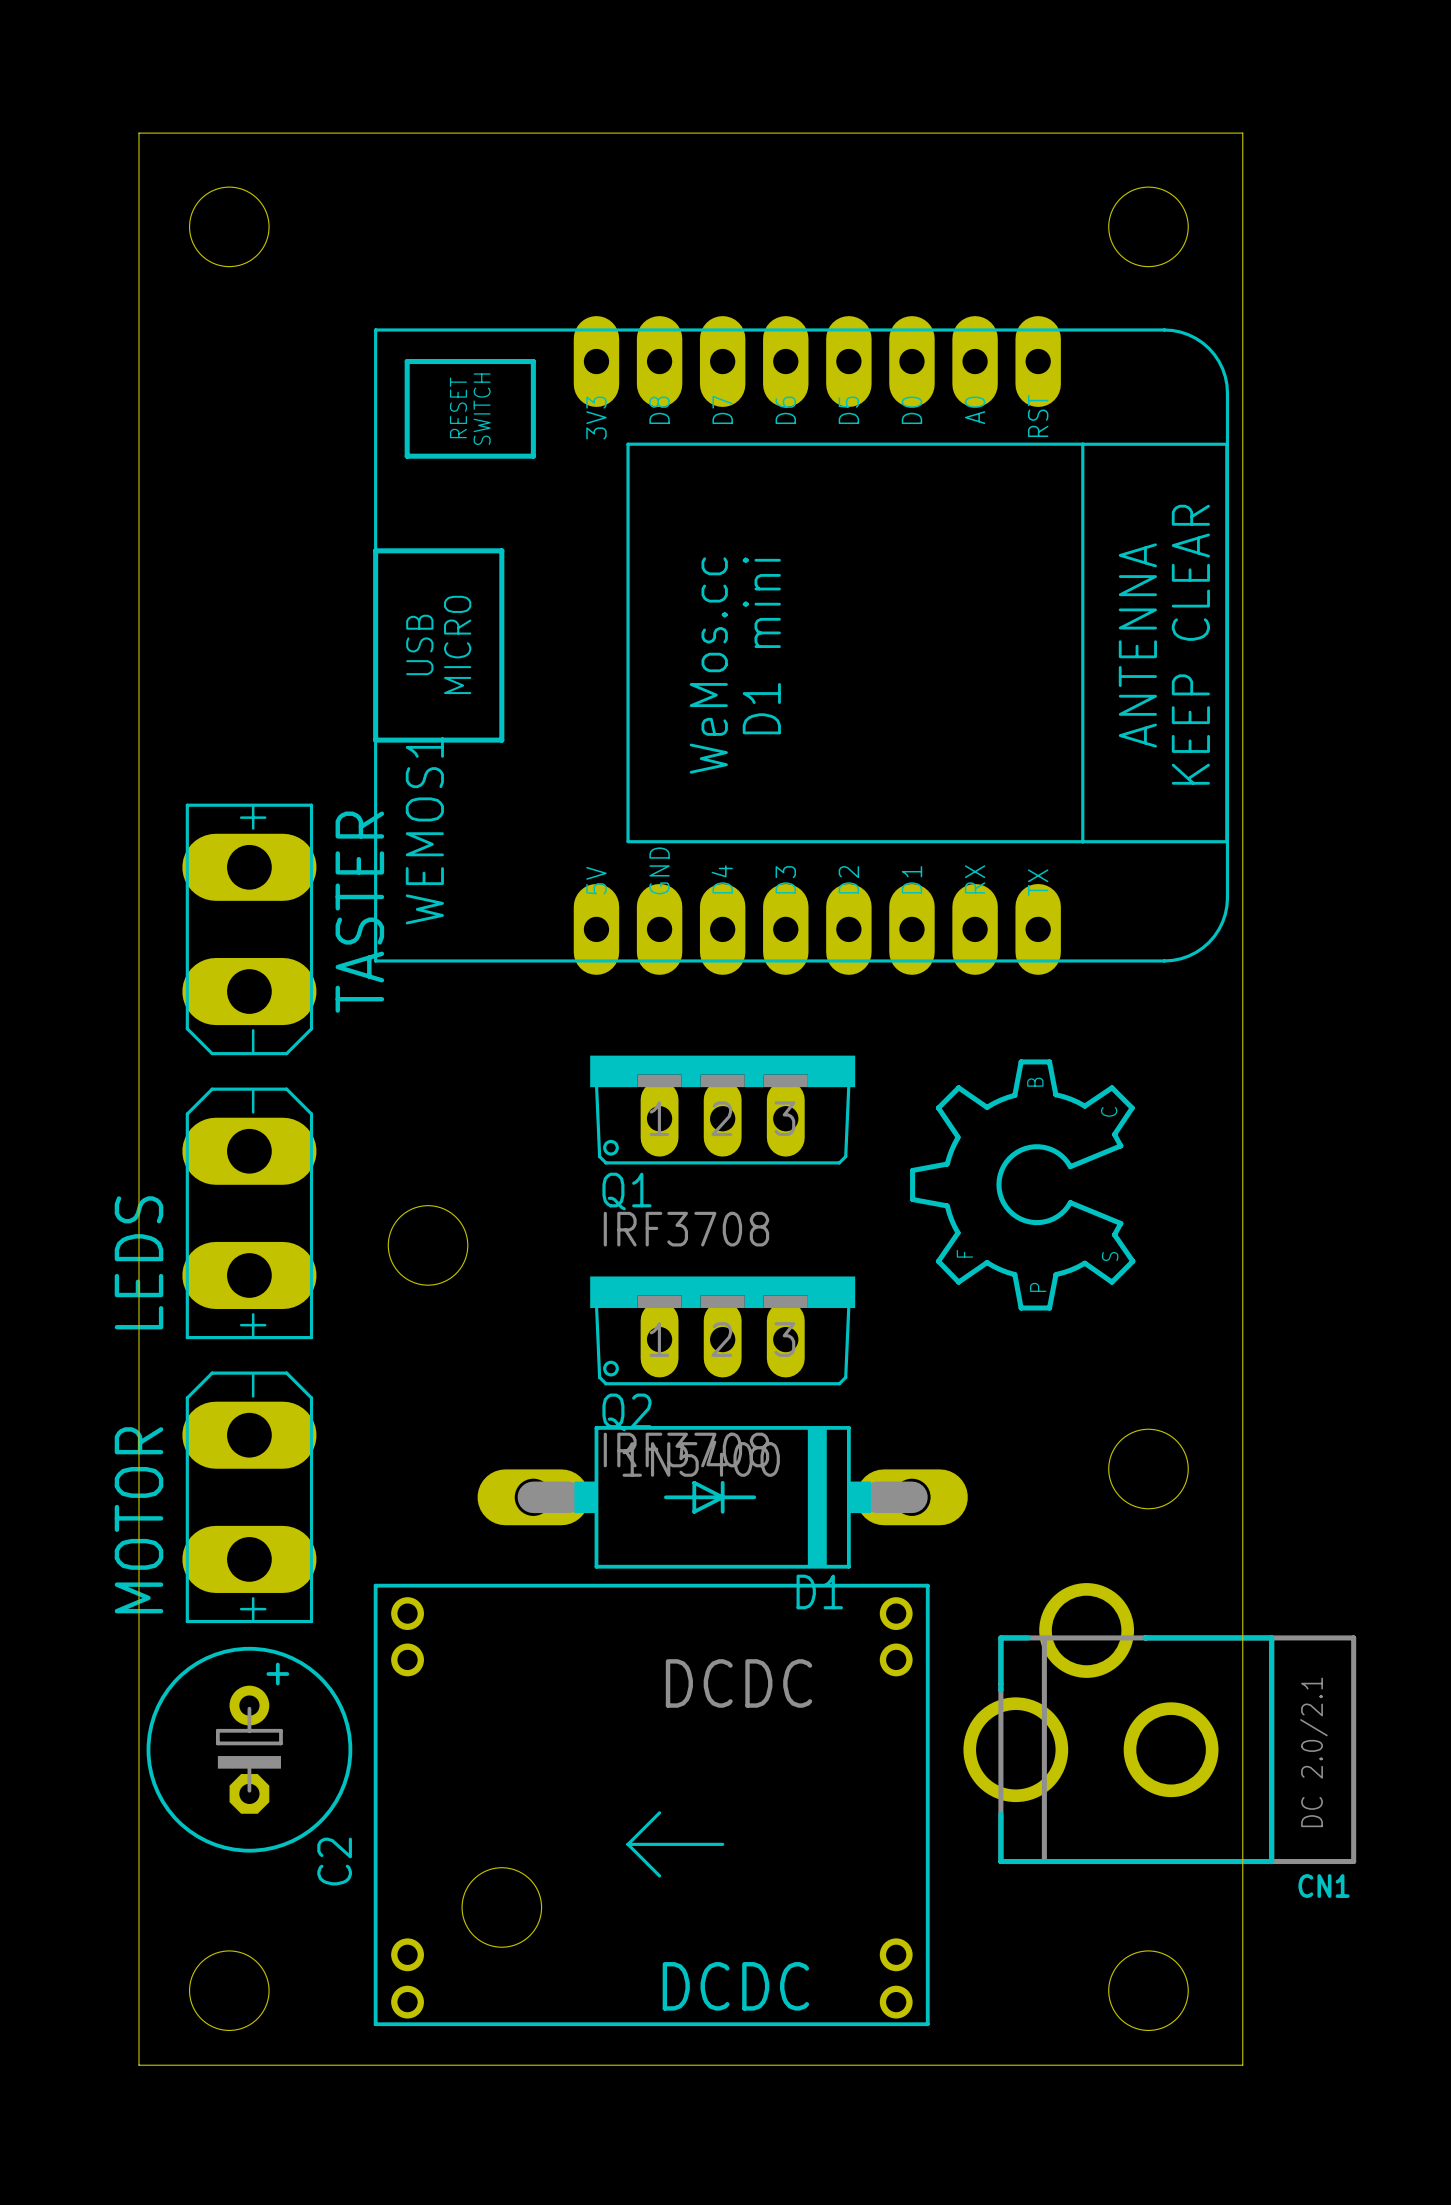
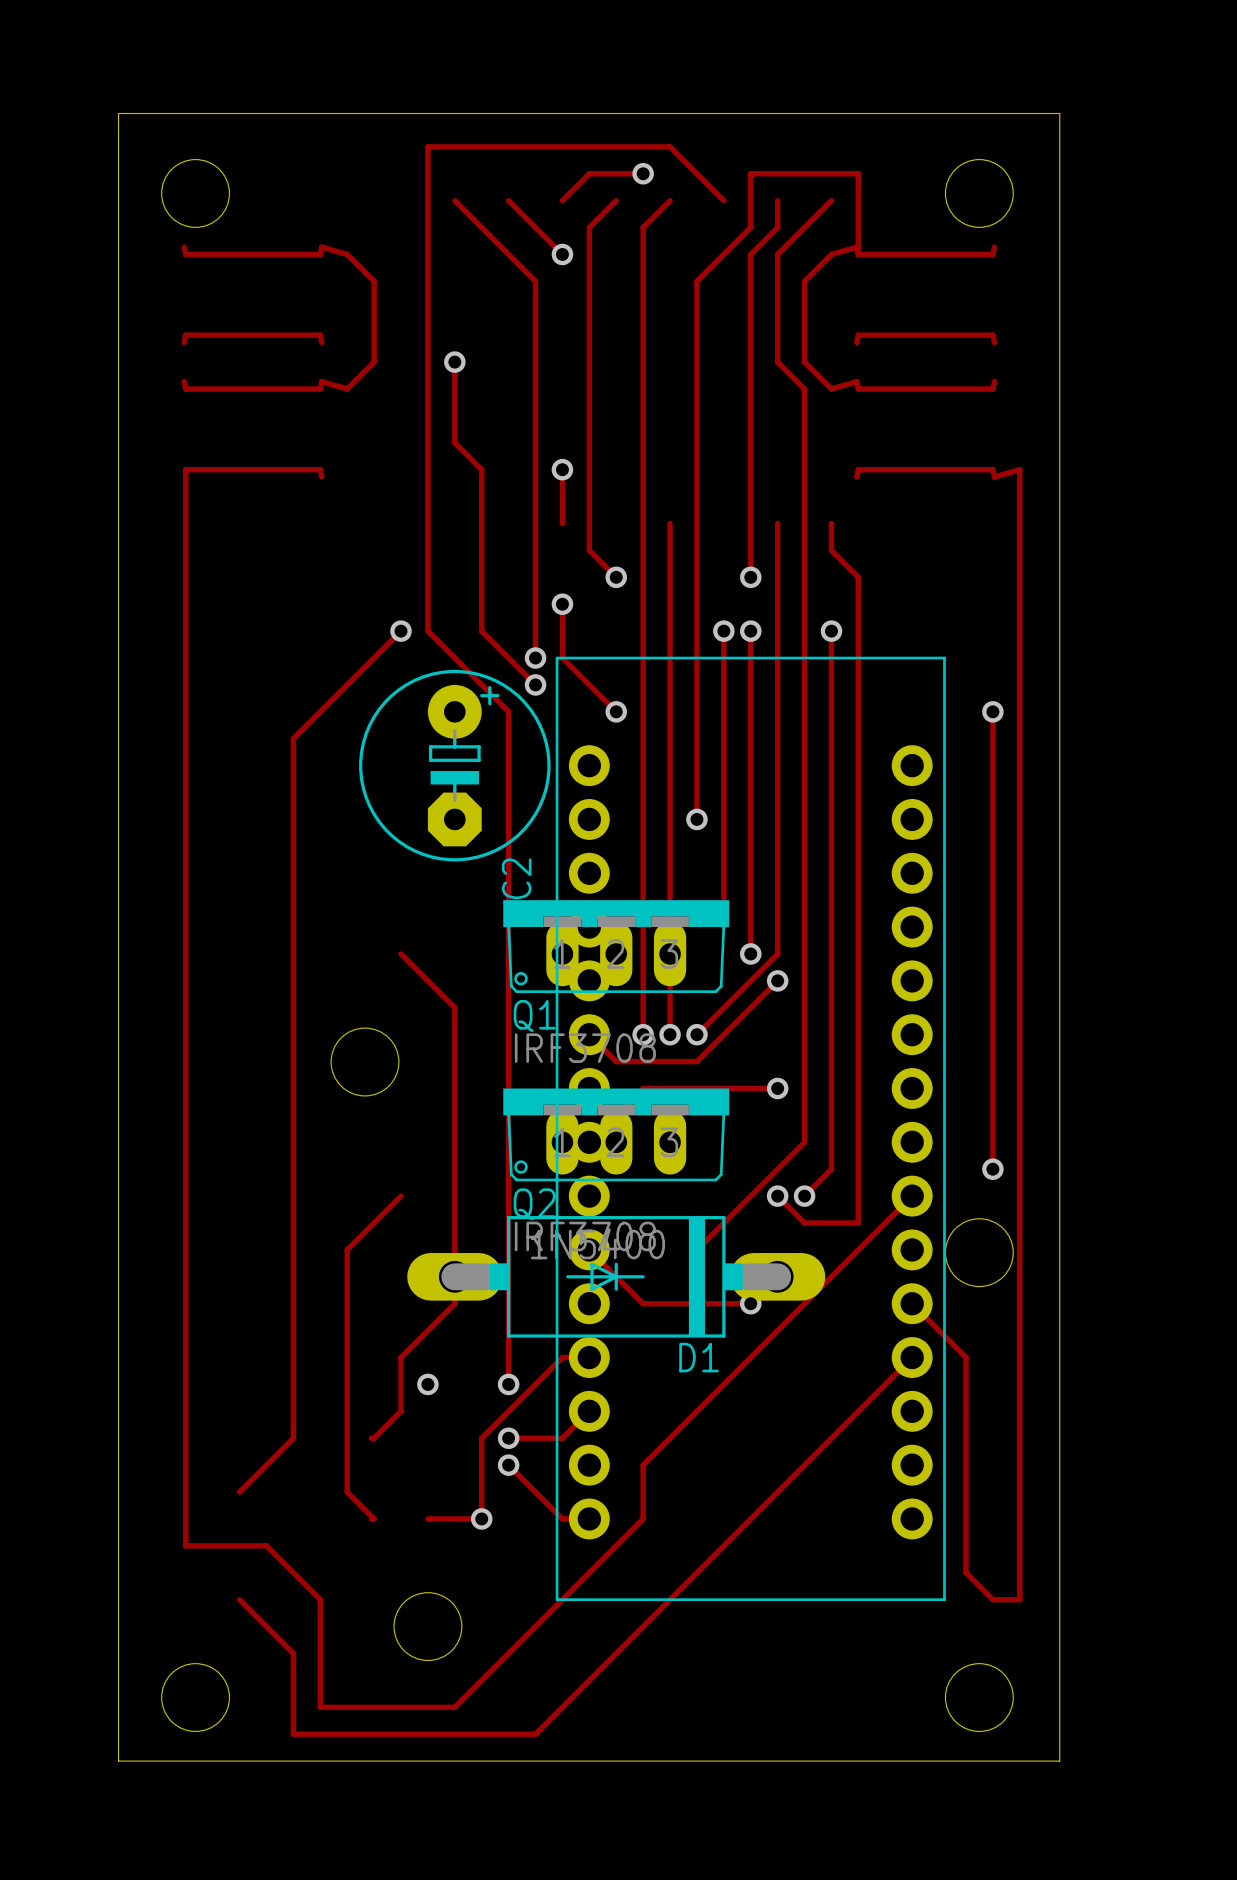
track: none -> (643, 173) (589, 173) (562, 200)
via: none -> (643, 173)
track: none -> (454, 200) (535, 281) (535, 658)
track: none -> (508, 200) (562, 254)
track: none -> (616, 200) (589, 227) (589, 550) (616, 577)
track: none -> (670, 200) (643, 227) (643, 1034)
track: none -> (723, 200) (670, 146) (427, 146) (427, 631) (508, 711) (508, 1384)
track: none -> (777, 200) (777, 227) (750, 254) (750, 577)
track: none -> (831, 200) (777, 254) (777, 362) (804, 388) (804, 1142) (696, 1249)
track: none -> (184, 247) (185, 254) (320, 254) (321, 247) (347, 254) (374, 281) (374, 362) (347, 388) (321, 381) (320, 388) (185, 388) (184, 381)
track: none -> (994, 247) (992, 254) (858, 254)
via: none -> (562, 254)
track: none -> (858, 254) (858, 173) (750, 173) (750, 227) (696, 281) (696, 819)
track: none -> (858, 254) (856, 247) (831, 254) (804, 281) (804, 362) (831, 388) (856, 381) (858, 388) (992, 388) (994, 381)
track: none -> (184, 342) (185, 335) (320, 335) (321, 342)
track: none -> (856, 342) (858, 335) (992, 335) (994, 342)
track: none -> (454, 362) (454, 442) (481, 469) (481, 631) (535, 684)
via: none -> (454, 362)
track: none -> (562, 469) (562, 523)
via: none -> (562, 469)
track: none -> (321, 477) (320, 469) (185, 469) (185, 1545) (266, 1545) (320, 1599) (320, 1707) (454, 1707) (643, 1518) (643, 1465) (912, 1196)
track: none -> (856, 477) (858, 469) (992, 469) (994, 477) (1019, 469) (1019, 1599) (992, 1599) (966, 1572) (966, 1357) (912, 1303)
track: none -> (670, 523) (670, 1034)
track: none -> (777, 523) (777, 953) (696, 1034)
track: none -> (831, 523) (831, 550) (858, 577) (858, 1223) (804, 1223) (777, 1196)
WEMOS1: (801, 645) -> none
via: none -> (616, 577)
via: none -> (750, 577)
track: none -> (562, 604) (562, 658) (616, 711)
via: none -> (562, 604)
track: none -> (401, 631) (293, 738) (293, 1438) (239, 1492)
via: none -> (401, 631)
track: none -> (723, 631) (723, 927)
via: none -> (723, 631)
track: none -> (750, 631) (750, 953)
via: none -> (750, 631)
track: none -> (831, 631) (831, 1169) (804, 1196)
via: none -> (831, 631)
via: none -> (535, 658)
via: none -> (535, 684)
via: none -> (616, 711)
track: none -> (992, 711) (992, 1169)
via: none -> (992, 711)
TASTER: (249, 929) -> none
via: none -> (696, 819)
drawing: [910, 1059, 1136, 1311] -> none
track: none -> (401, 953) (454, 1007) (454, 1303) (401, 1357) (401, 1411) (374, 1438) (371, 1438)
via: none -> (750, 953)
track: none -> (777, 980) (696, 1061) (616, 1061) (589, 1034)
via: none -> (777, 980)
LEDS: (249, 1213) -> none
via: none -> (643, 1034)
via: none -> (670, 1034)
via: none -> (696, 1034)
track: none -> (777, 1088) (643, 1088) (589, 1142)
via: none -> (777, 1088)
part: none -> (750, 1128)
via: none -> (992, 1169)
track: none -> (401, 1196) (347, 1249) (347, 1492) (374, 1518) (371, 1518)
via: none -> (777, 1196)
via: none -> (804, 1196)
track: none -> (589, 1249) (643, 1303) (750, 1303)
MOTOR: (249, 1497) -> none
via: none -> (750, 1303)
track: none -> (589, 1357) (562, 1357) (481, 1438) (481, 1518) (427, 1518)
track: none -> (912, 1357) (535, 1734) (293, 1734) (293, 1653) (239, 1599)
via: none -> (427, 1384)
via: none -> (508, 1384)
C2 footprint: [146, 1646, 353, 1853] -> [359, 669, 551, 862]
track: none -> (589, 1411) (562, 1438) (508, 1438)
via: none -> (508, 1438)
track: none -> (508, 1465) (562, 1518) (589, 1518)
via: none -> (508, 1465)
CN1: (1159, 1723) -> none
via: none -> (481, 1518)
DCDC: DCDC (651, 1804) -> none

